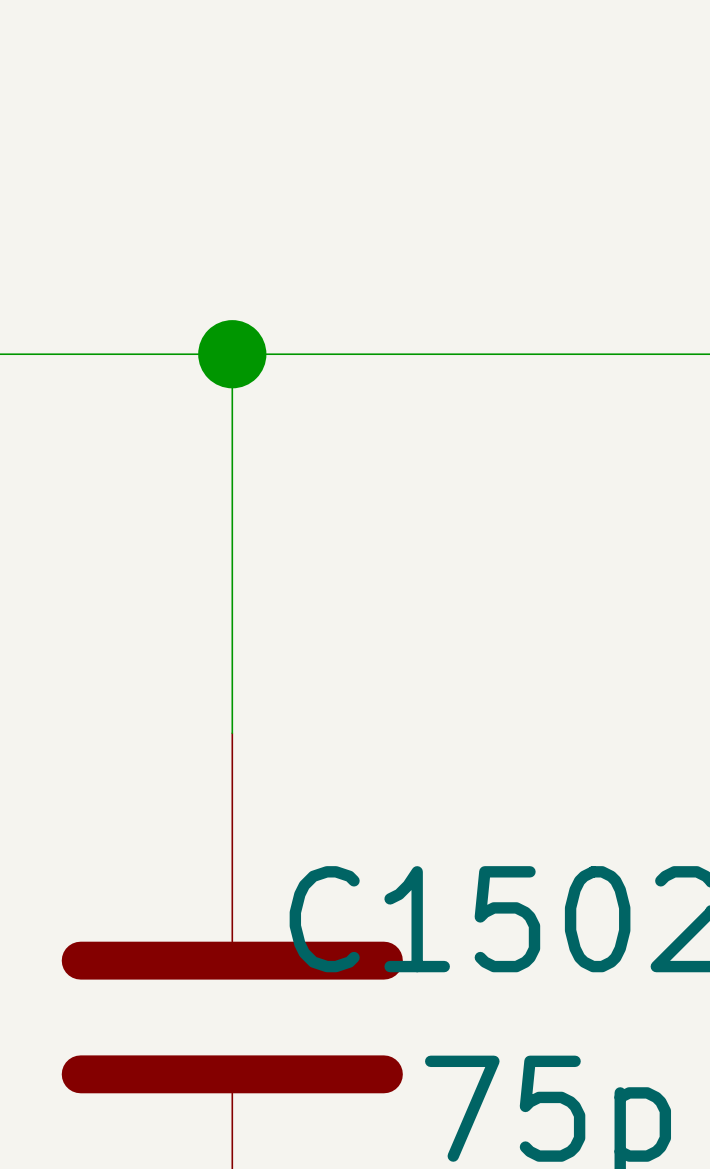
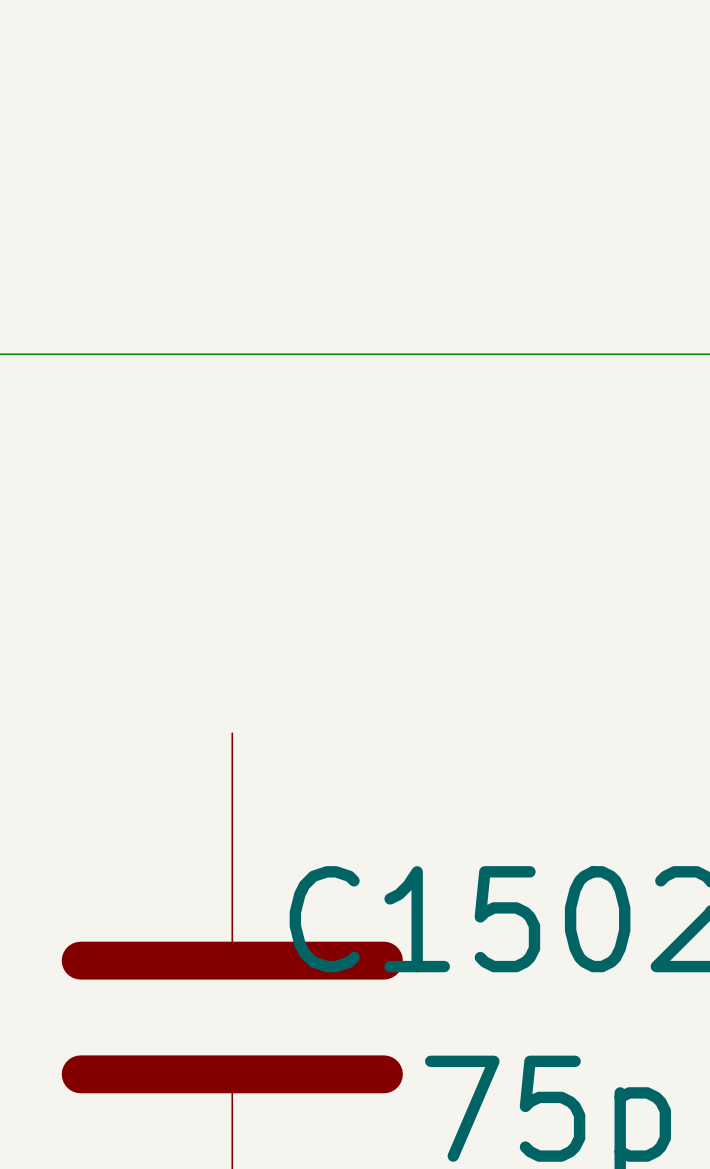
wire: (232, 354) (232, 733) -> none
junction: (232, 354) -> none

